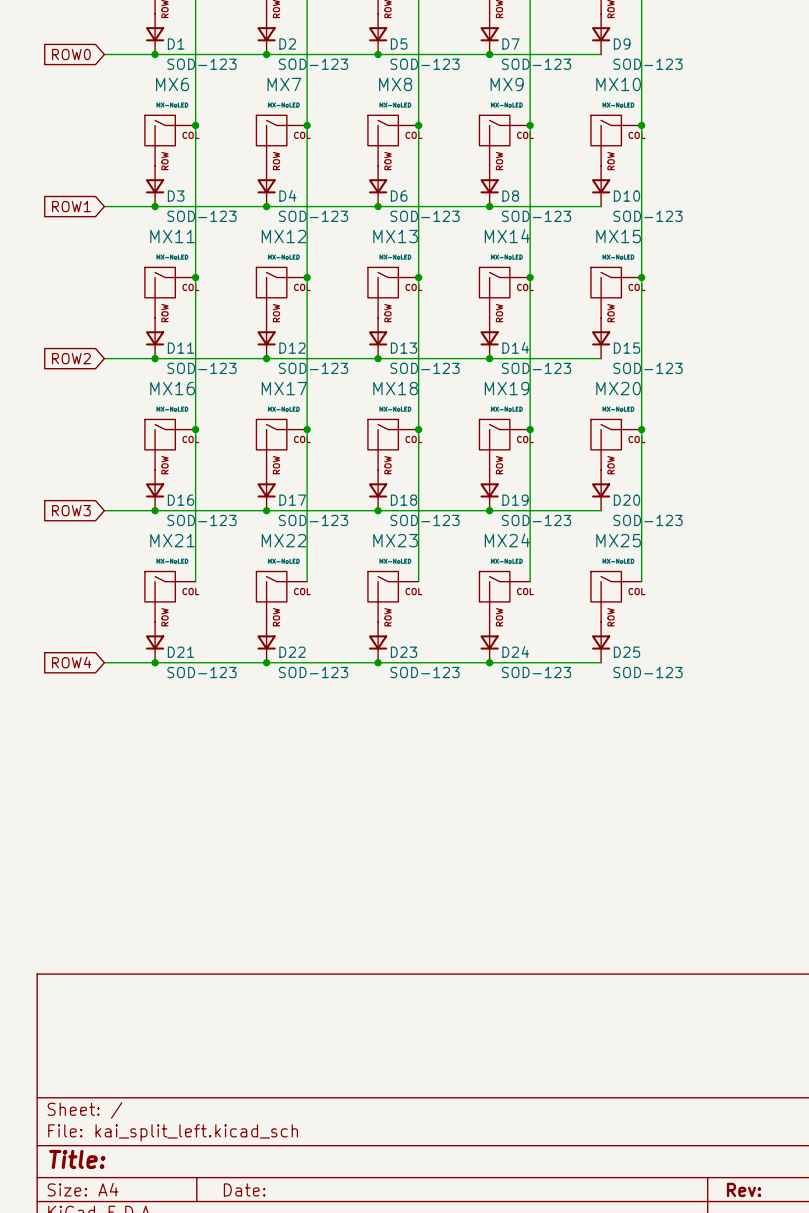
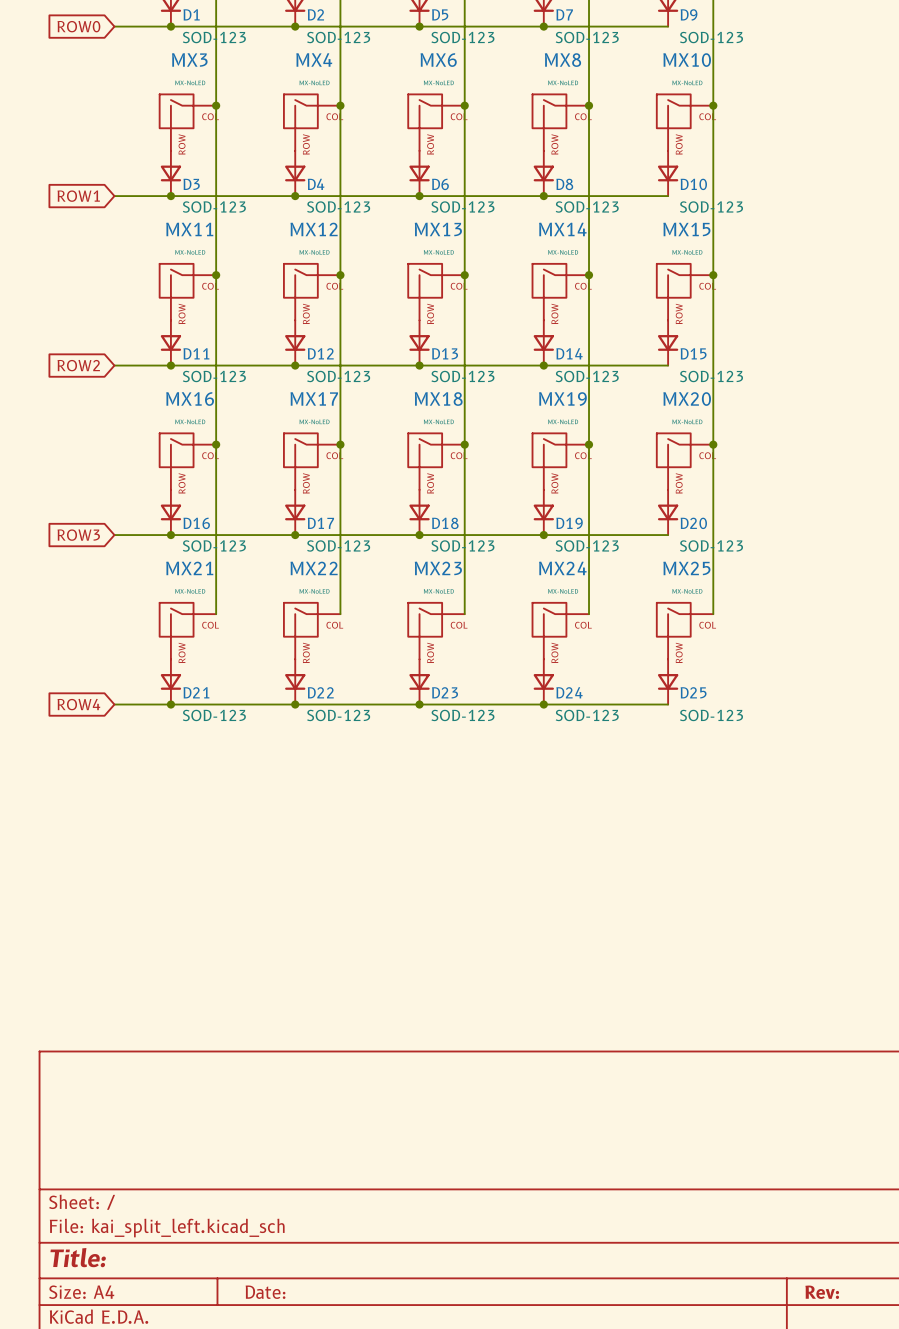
MX6 name: MX6 (172, 84) -> MX3 (189, 59)
MX7 name: MX7 (284, 84) -> MX4 (314, 59)
MX8 name: MX8 (395, 84) -> MX6 (438, 60)
MX9 name: MX9 (507, 84) -> MX8 (562, 60)

